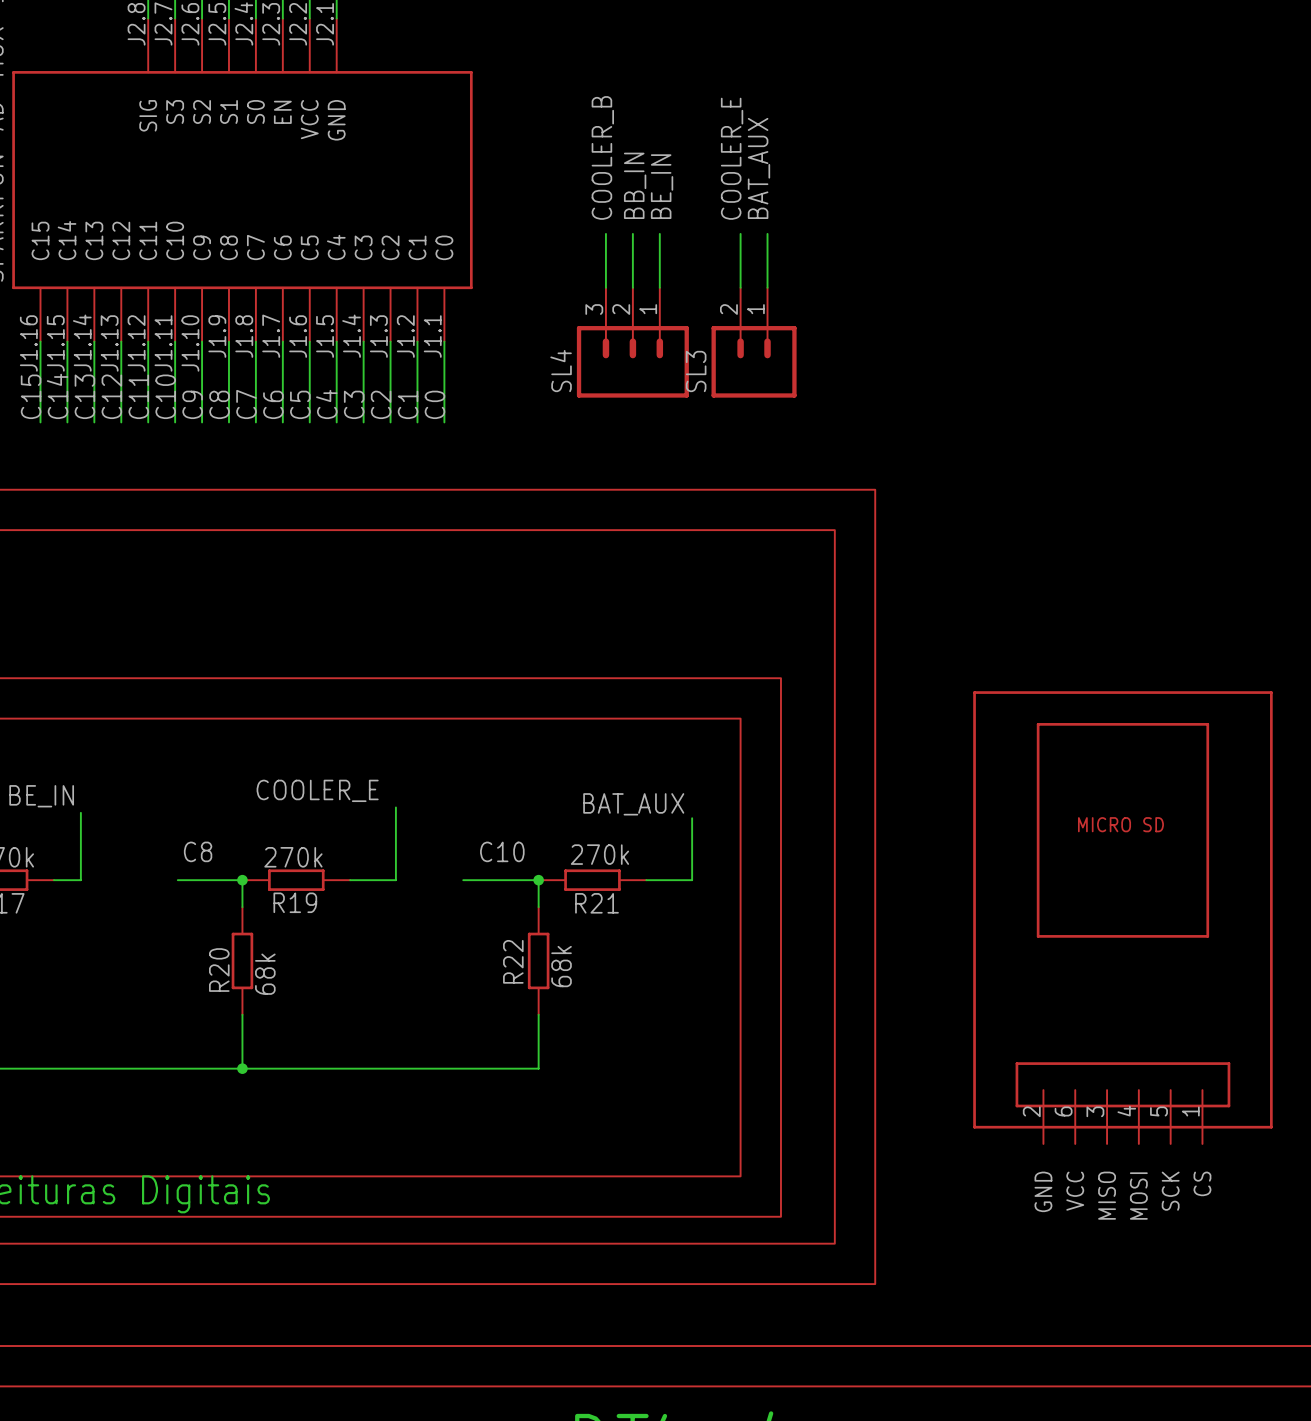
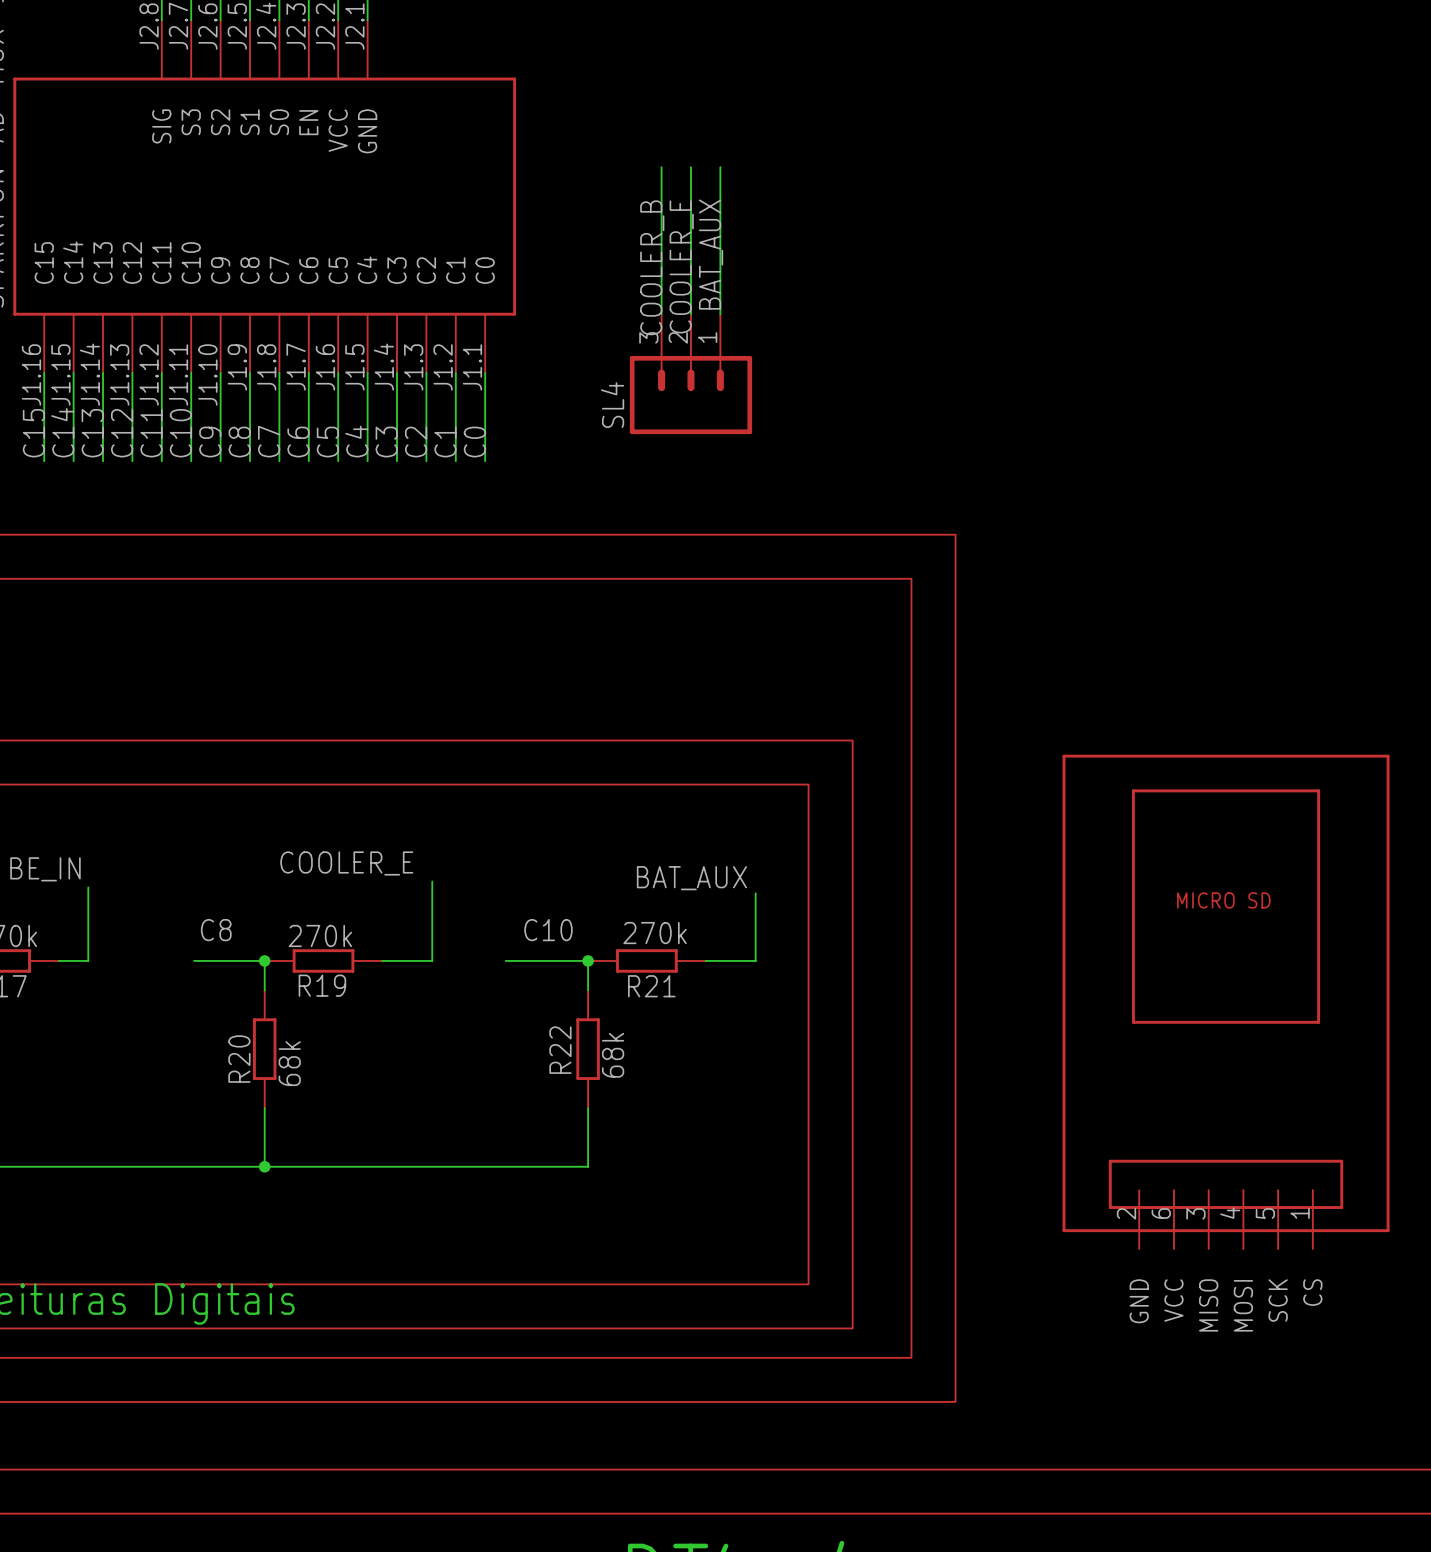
wire: none -> (661, 167) (661, 255)
wire: none -> (690, 167) (690, 255)
wire: none -> (720, 167) (720, 255)
label position: COOLER_B (602, 157) -> COOLER_B (652, 267)
label position: COOLER_E (732, 158) -> COOLER_E (681, 266)
label position: BAT_AUX (758, 168) -> BAT_AUX (711, 254)
label: BB_IN (635, 185) -> none
label: BE_IN (662, 186) -> none
wire: (740, 233) (740, 287) -> none
wire: (767, 233) (767, 287) -> none
SL3: (754, 342) -> none

